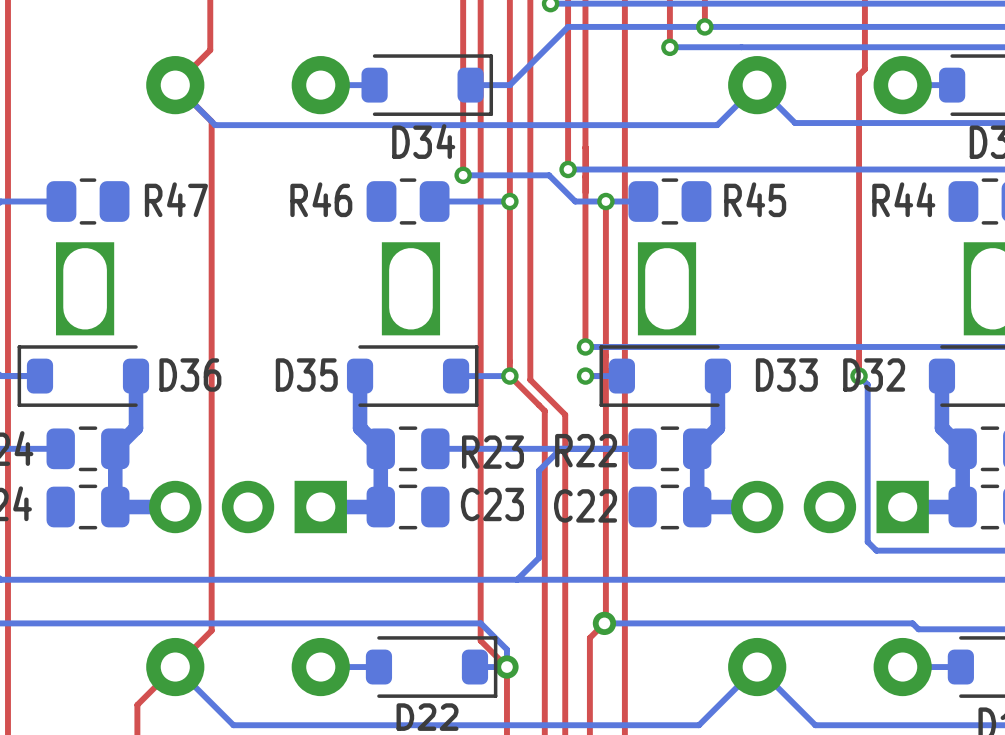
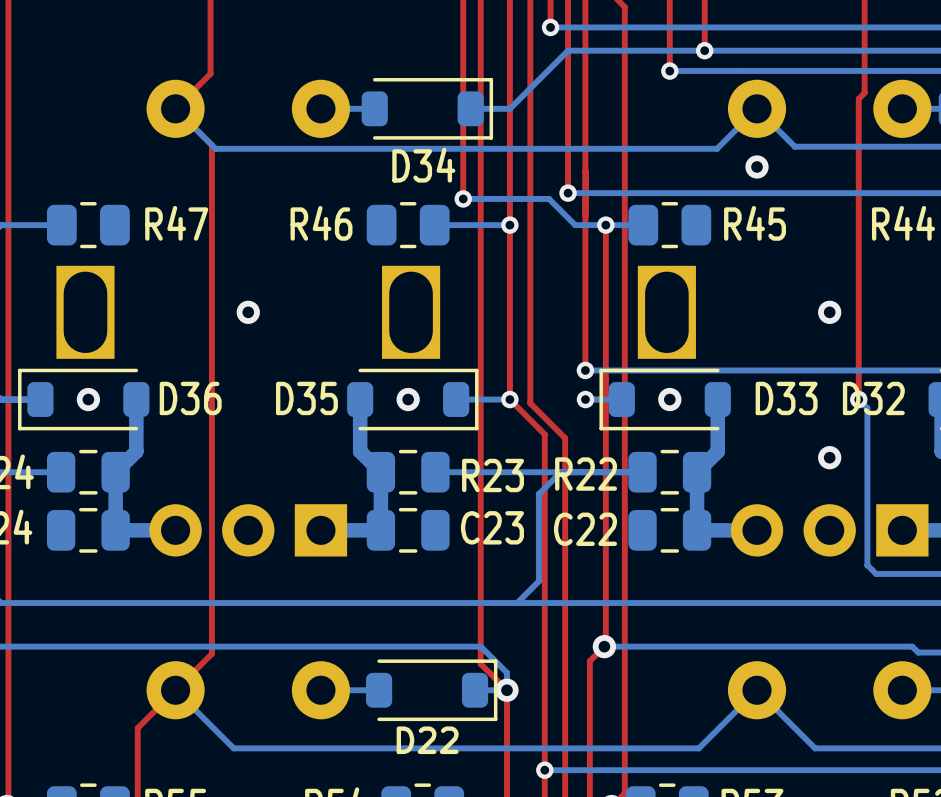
via: none -> (757, 166)
via: none -> (248, 312)
via: none -> (829, 312)
via: none -> (88, 399)
via: none -> (408, 399)
via: none -> (669, 399)
via: none -> (829, 457)

